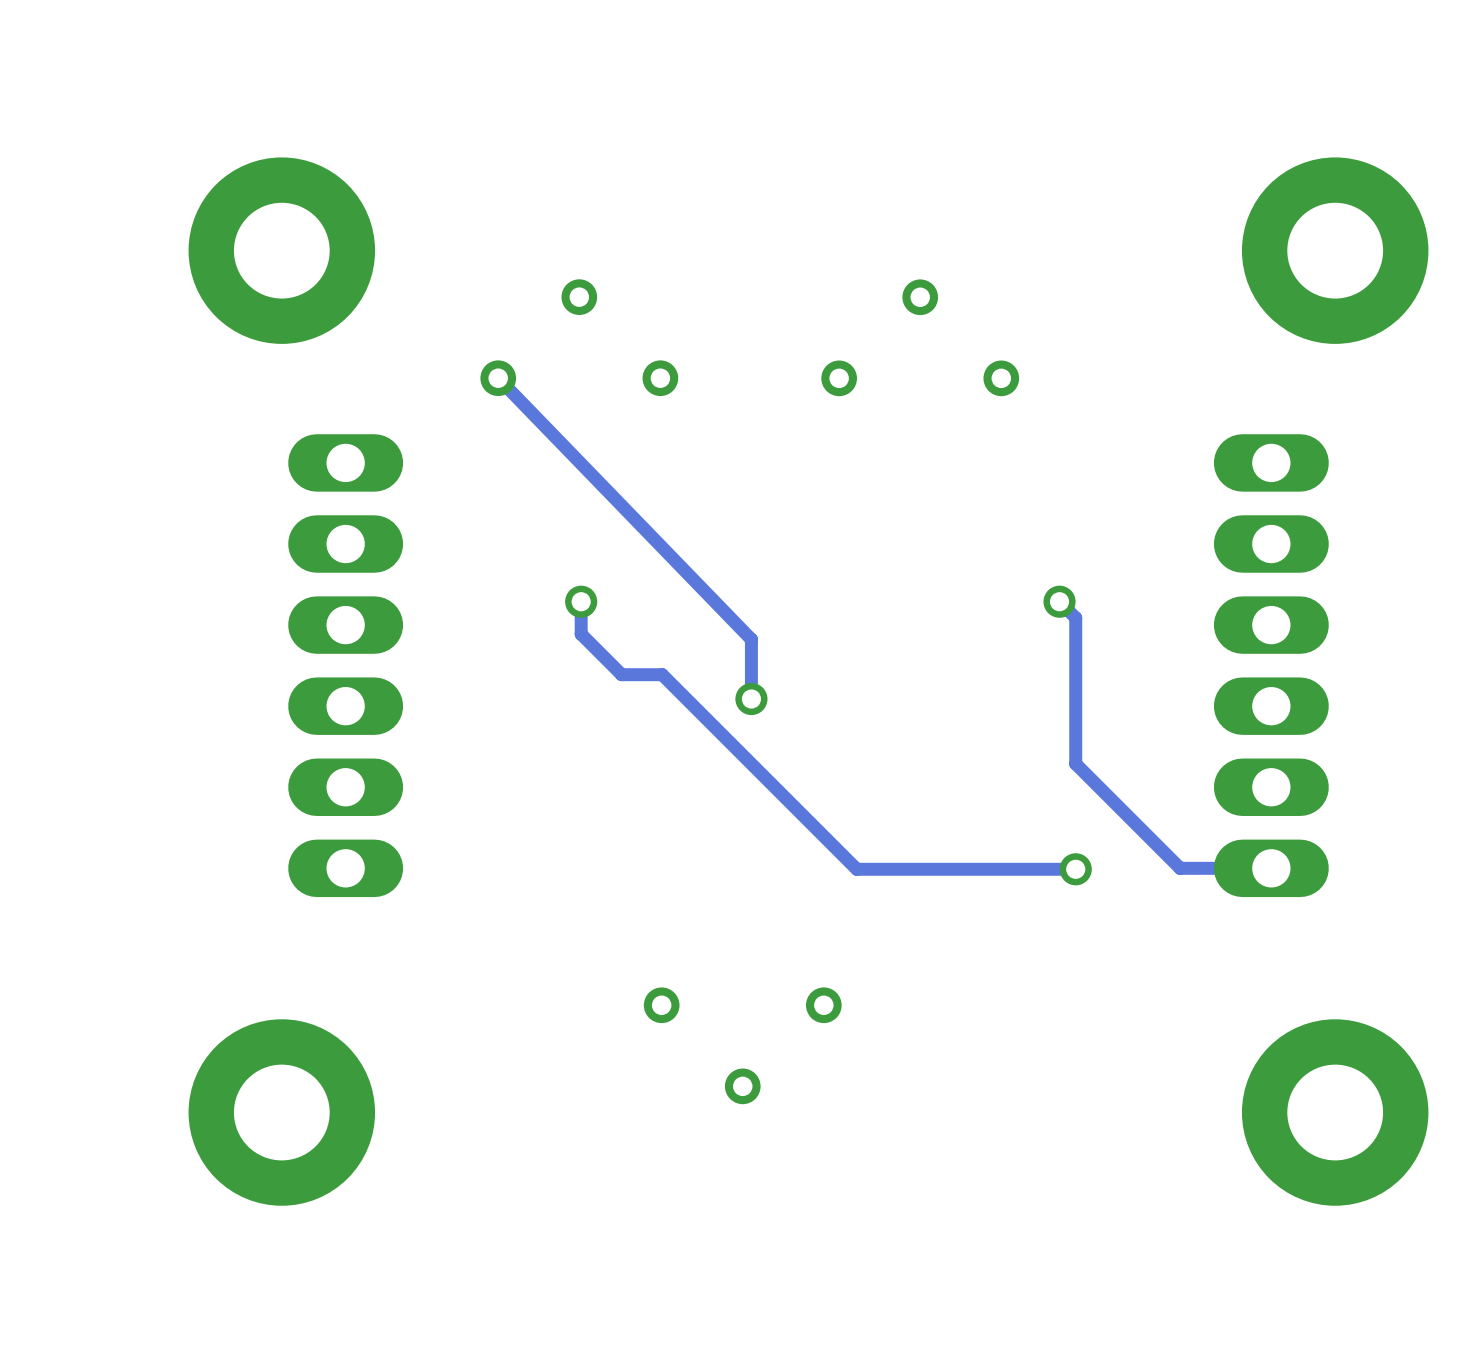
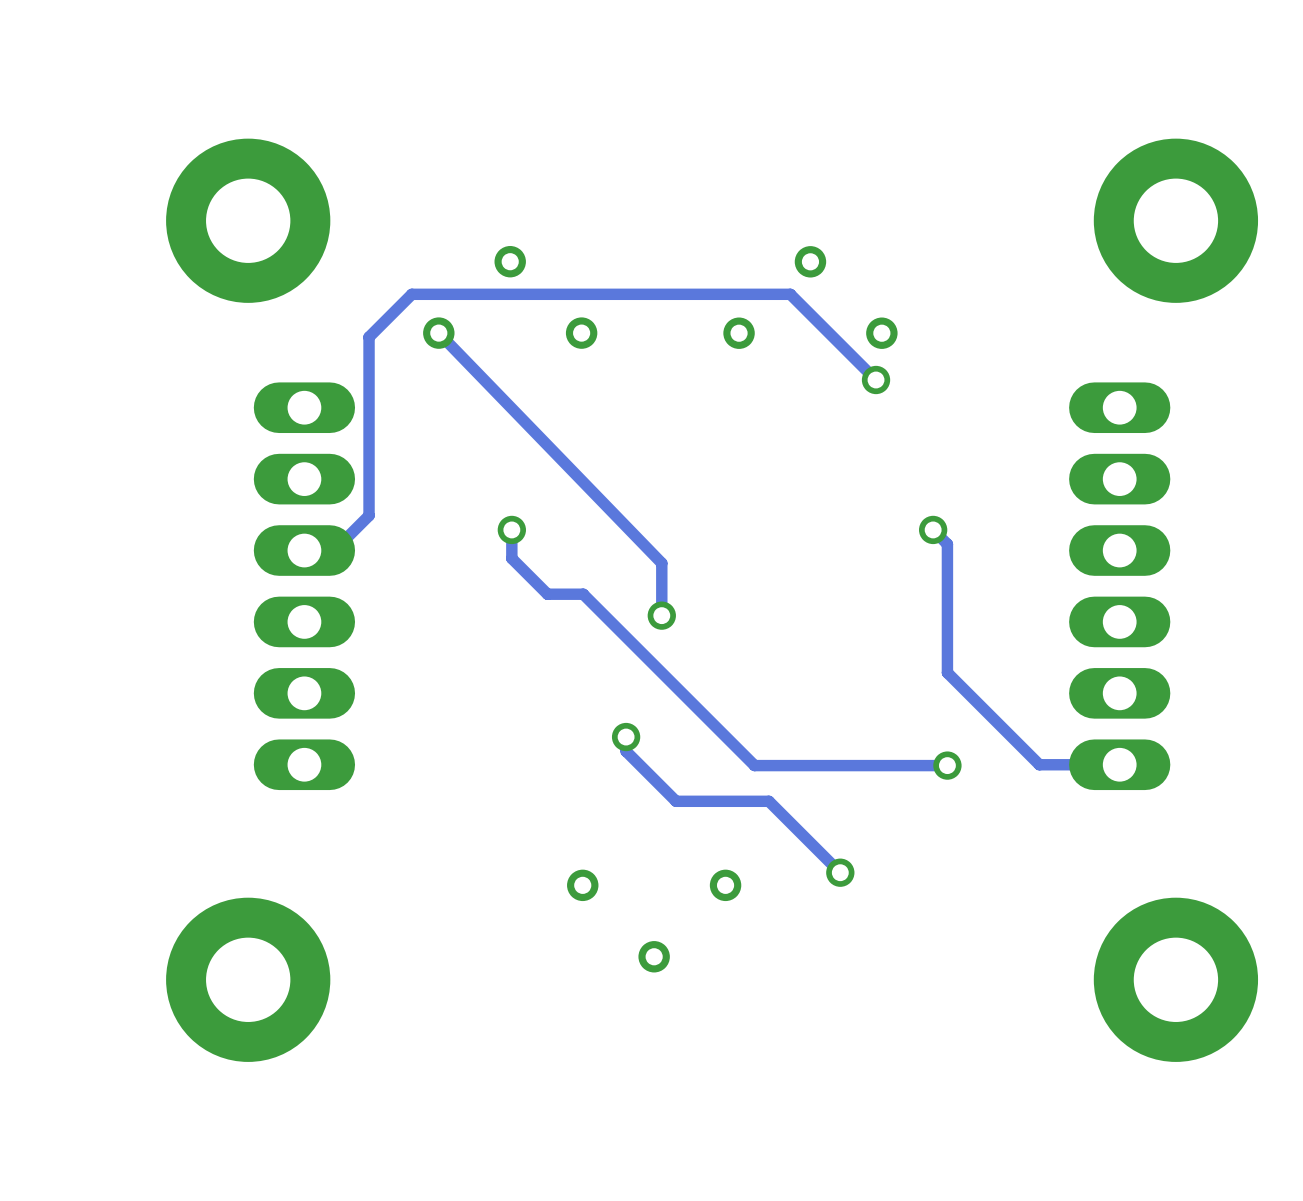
track: none -> (876, 379) (790, 294) (411, 294) (369, 337) (369, 515) (334, 550) (304, 550)
via: none -> (876, 379)
track: none -> (626, 737) (626, 751) (676, 801) (768, 801) (840, 872)
via: none -> (626, 737)
via: none -> (840, 872)

